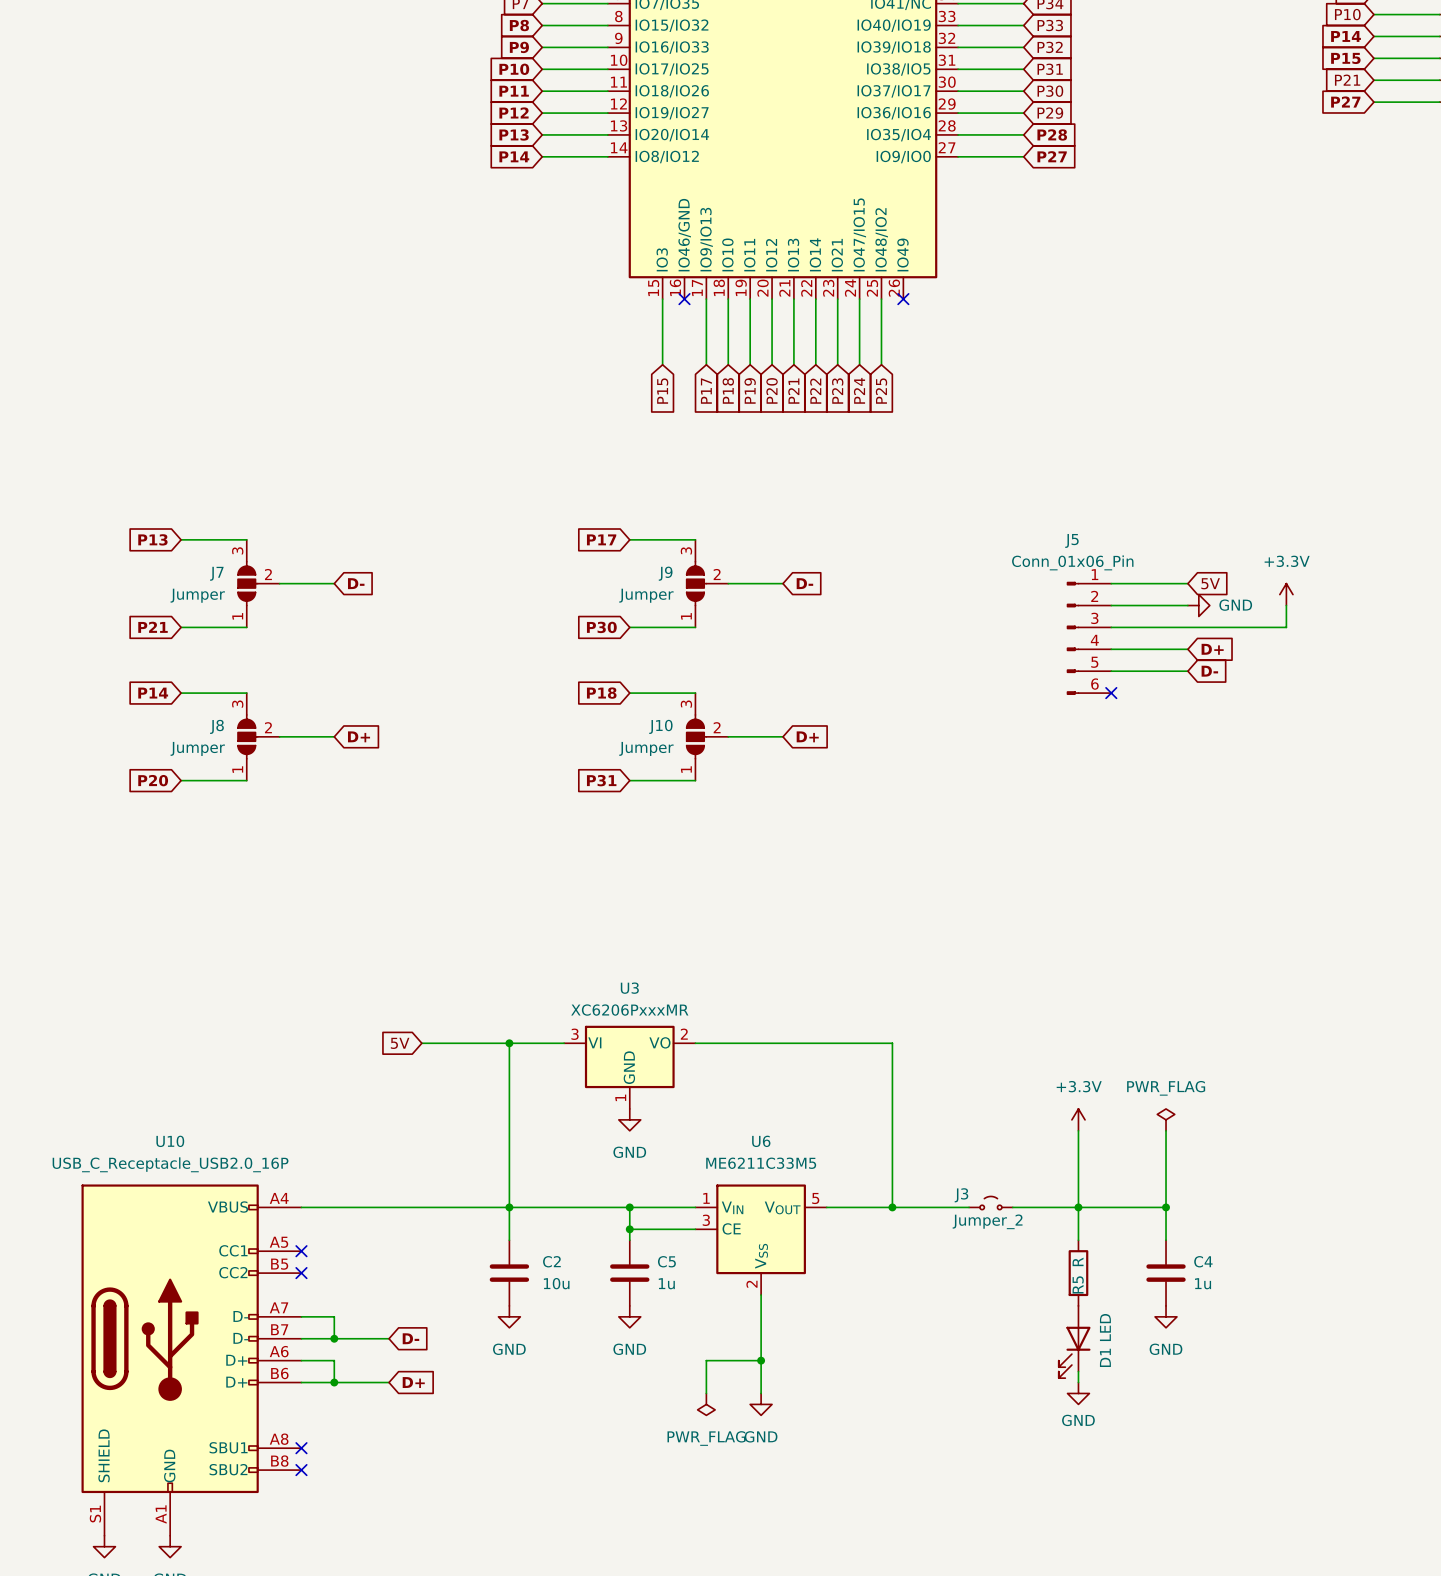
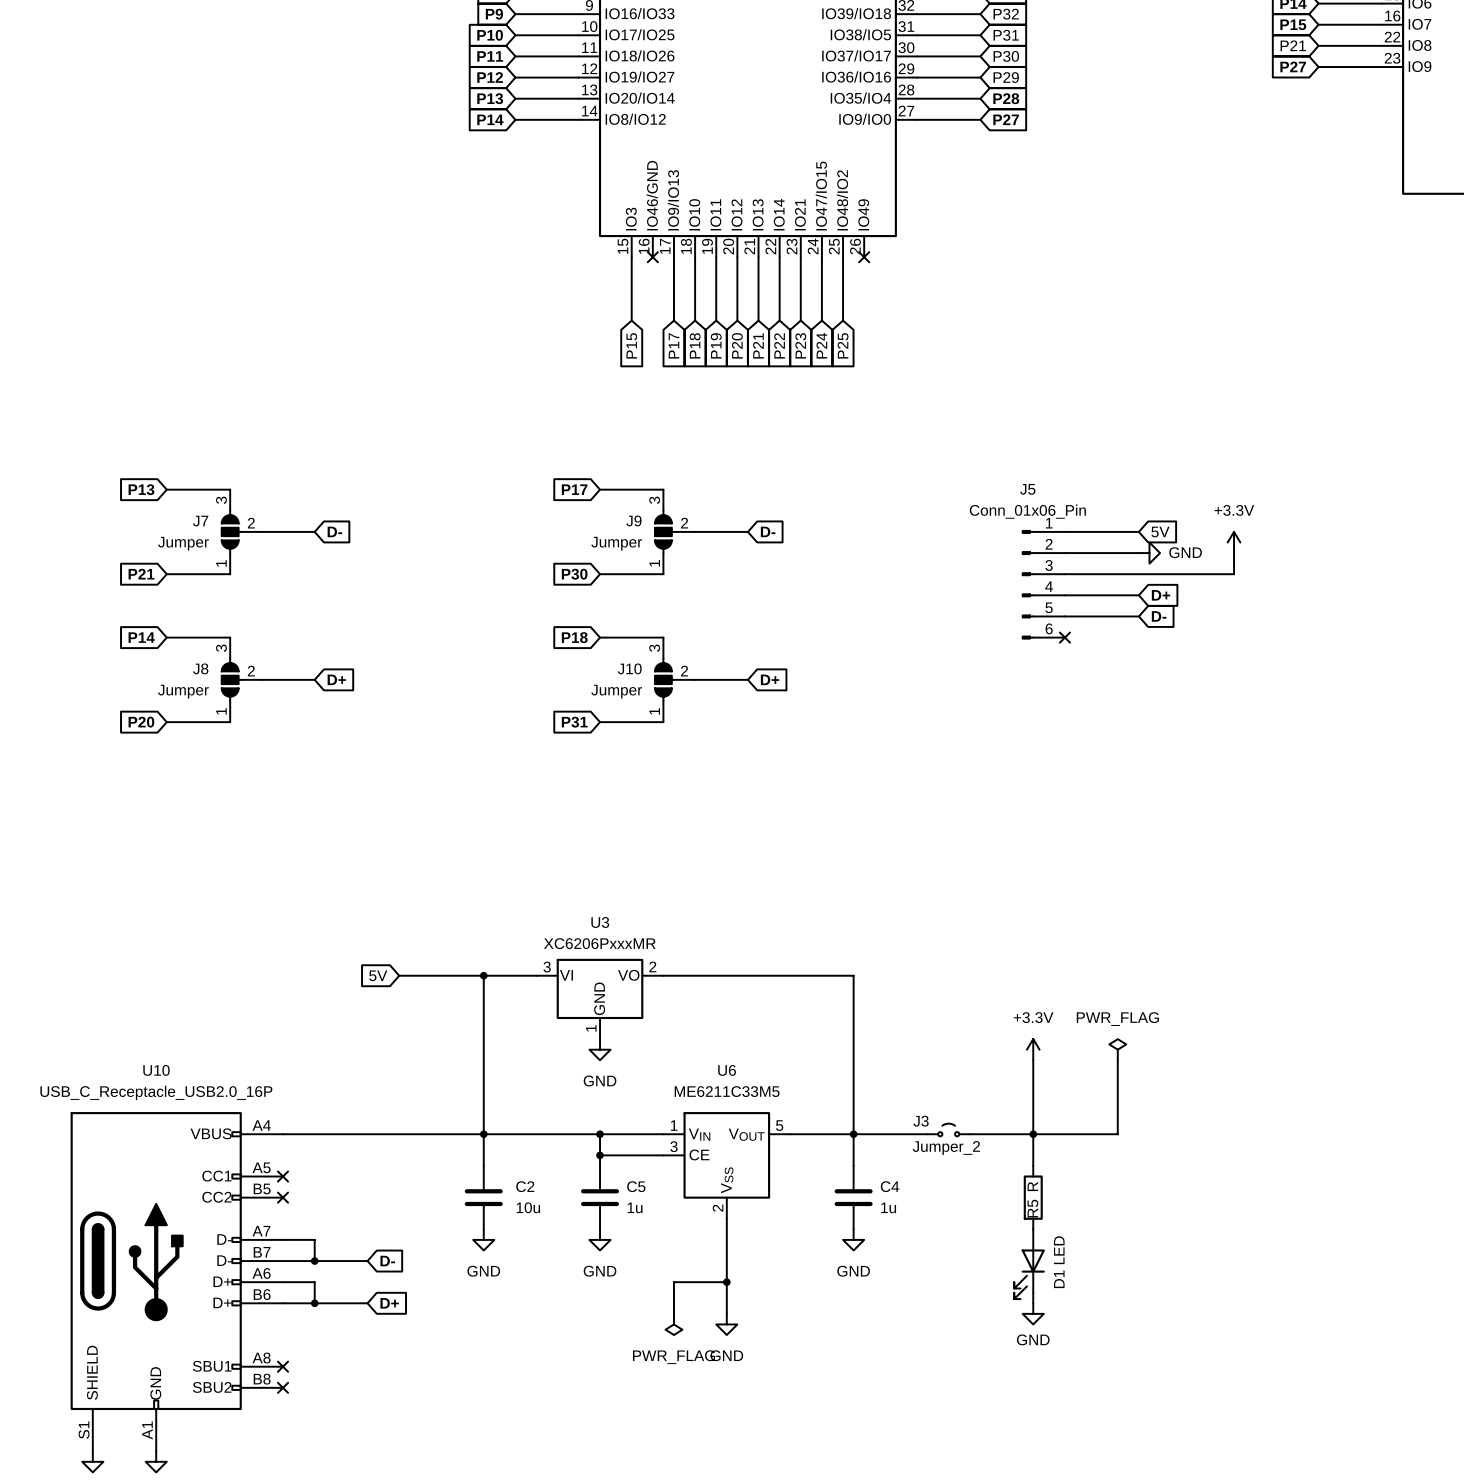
wire: none -> (853, 1134) (853, 1165)
wire: (1166, 1207) (1166, 1240) -> none
junction: (1166, 1207) -> none
C4 position: (1166, 1273) -> (853, 1197)
power symbol: none -> GND (853, 1239)
power symbol: GND (1166, 1316) -> none

